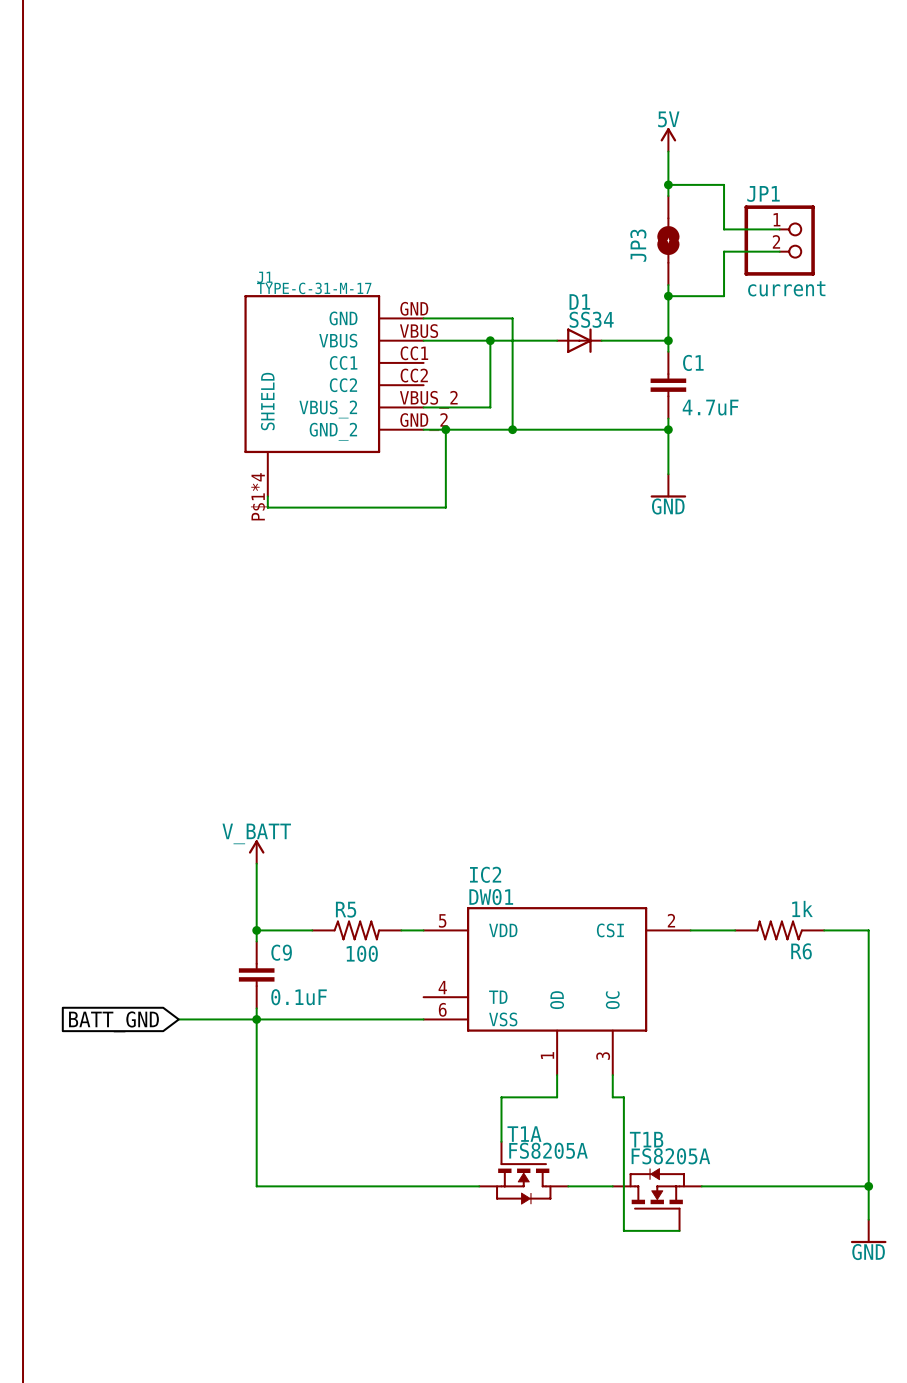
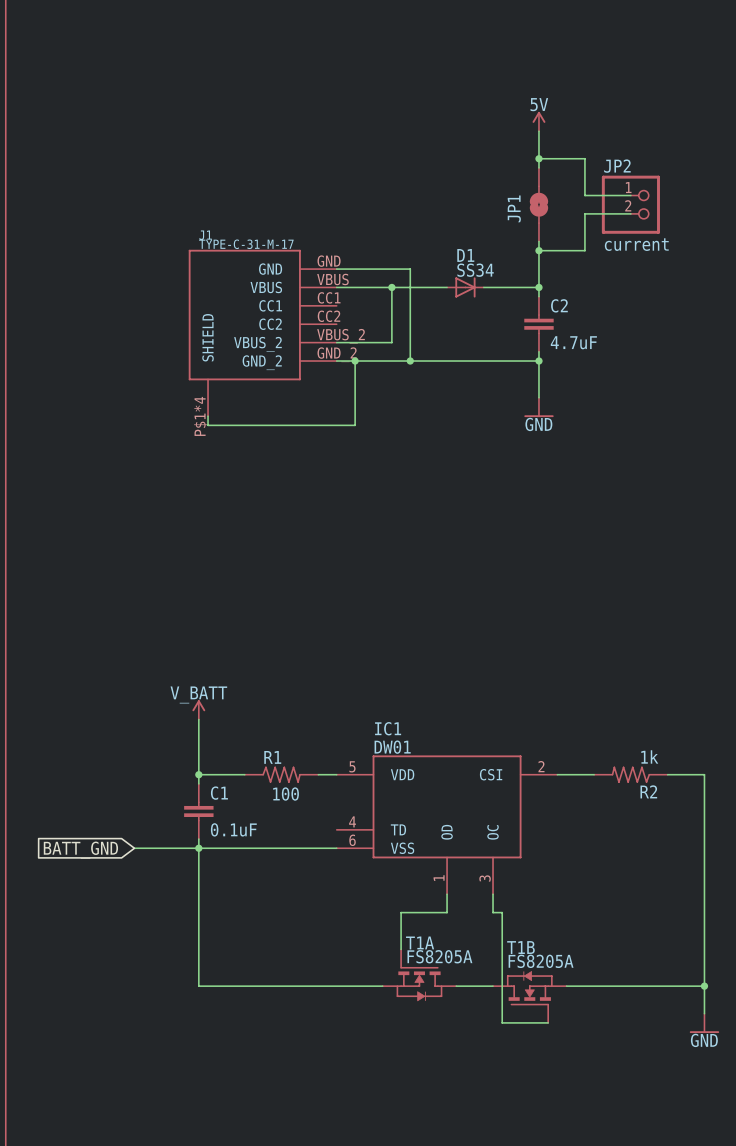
JP1 name: JP1 (763, 193) -> JP2 (617, 166)
JP3 name: JP3 (638, 245) -> JP1 (514, 208)
C1 name: C1 (693, 362) -> C2 (559, 305)
IC2 name: IC2 (485, 874) -> IC1 (388, 728)
R5 name: R5 (346, 909) -> R1 (272, 757)
R6 name: R6 (801, 951) -> R2 (648, 791)
C9 name: C9 (281, 952) -> C1 (219, 793)

